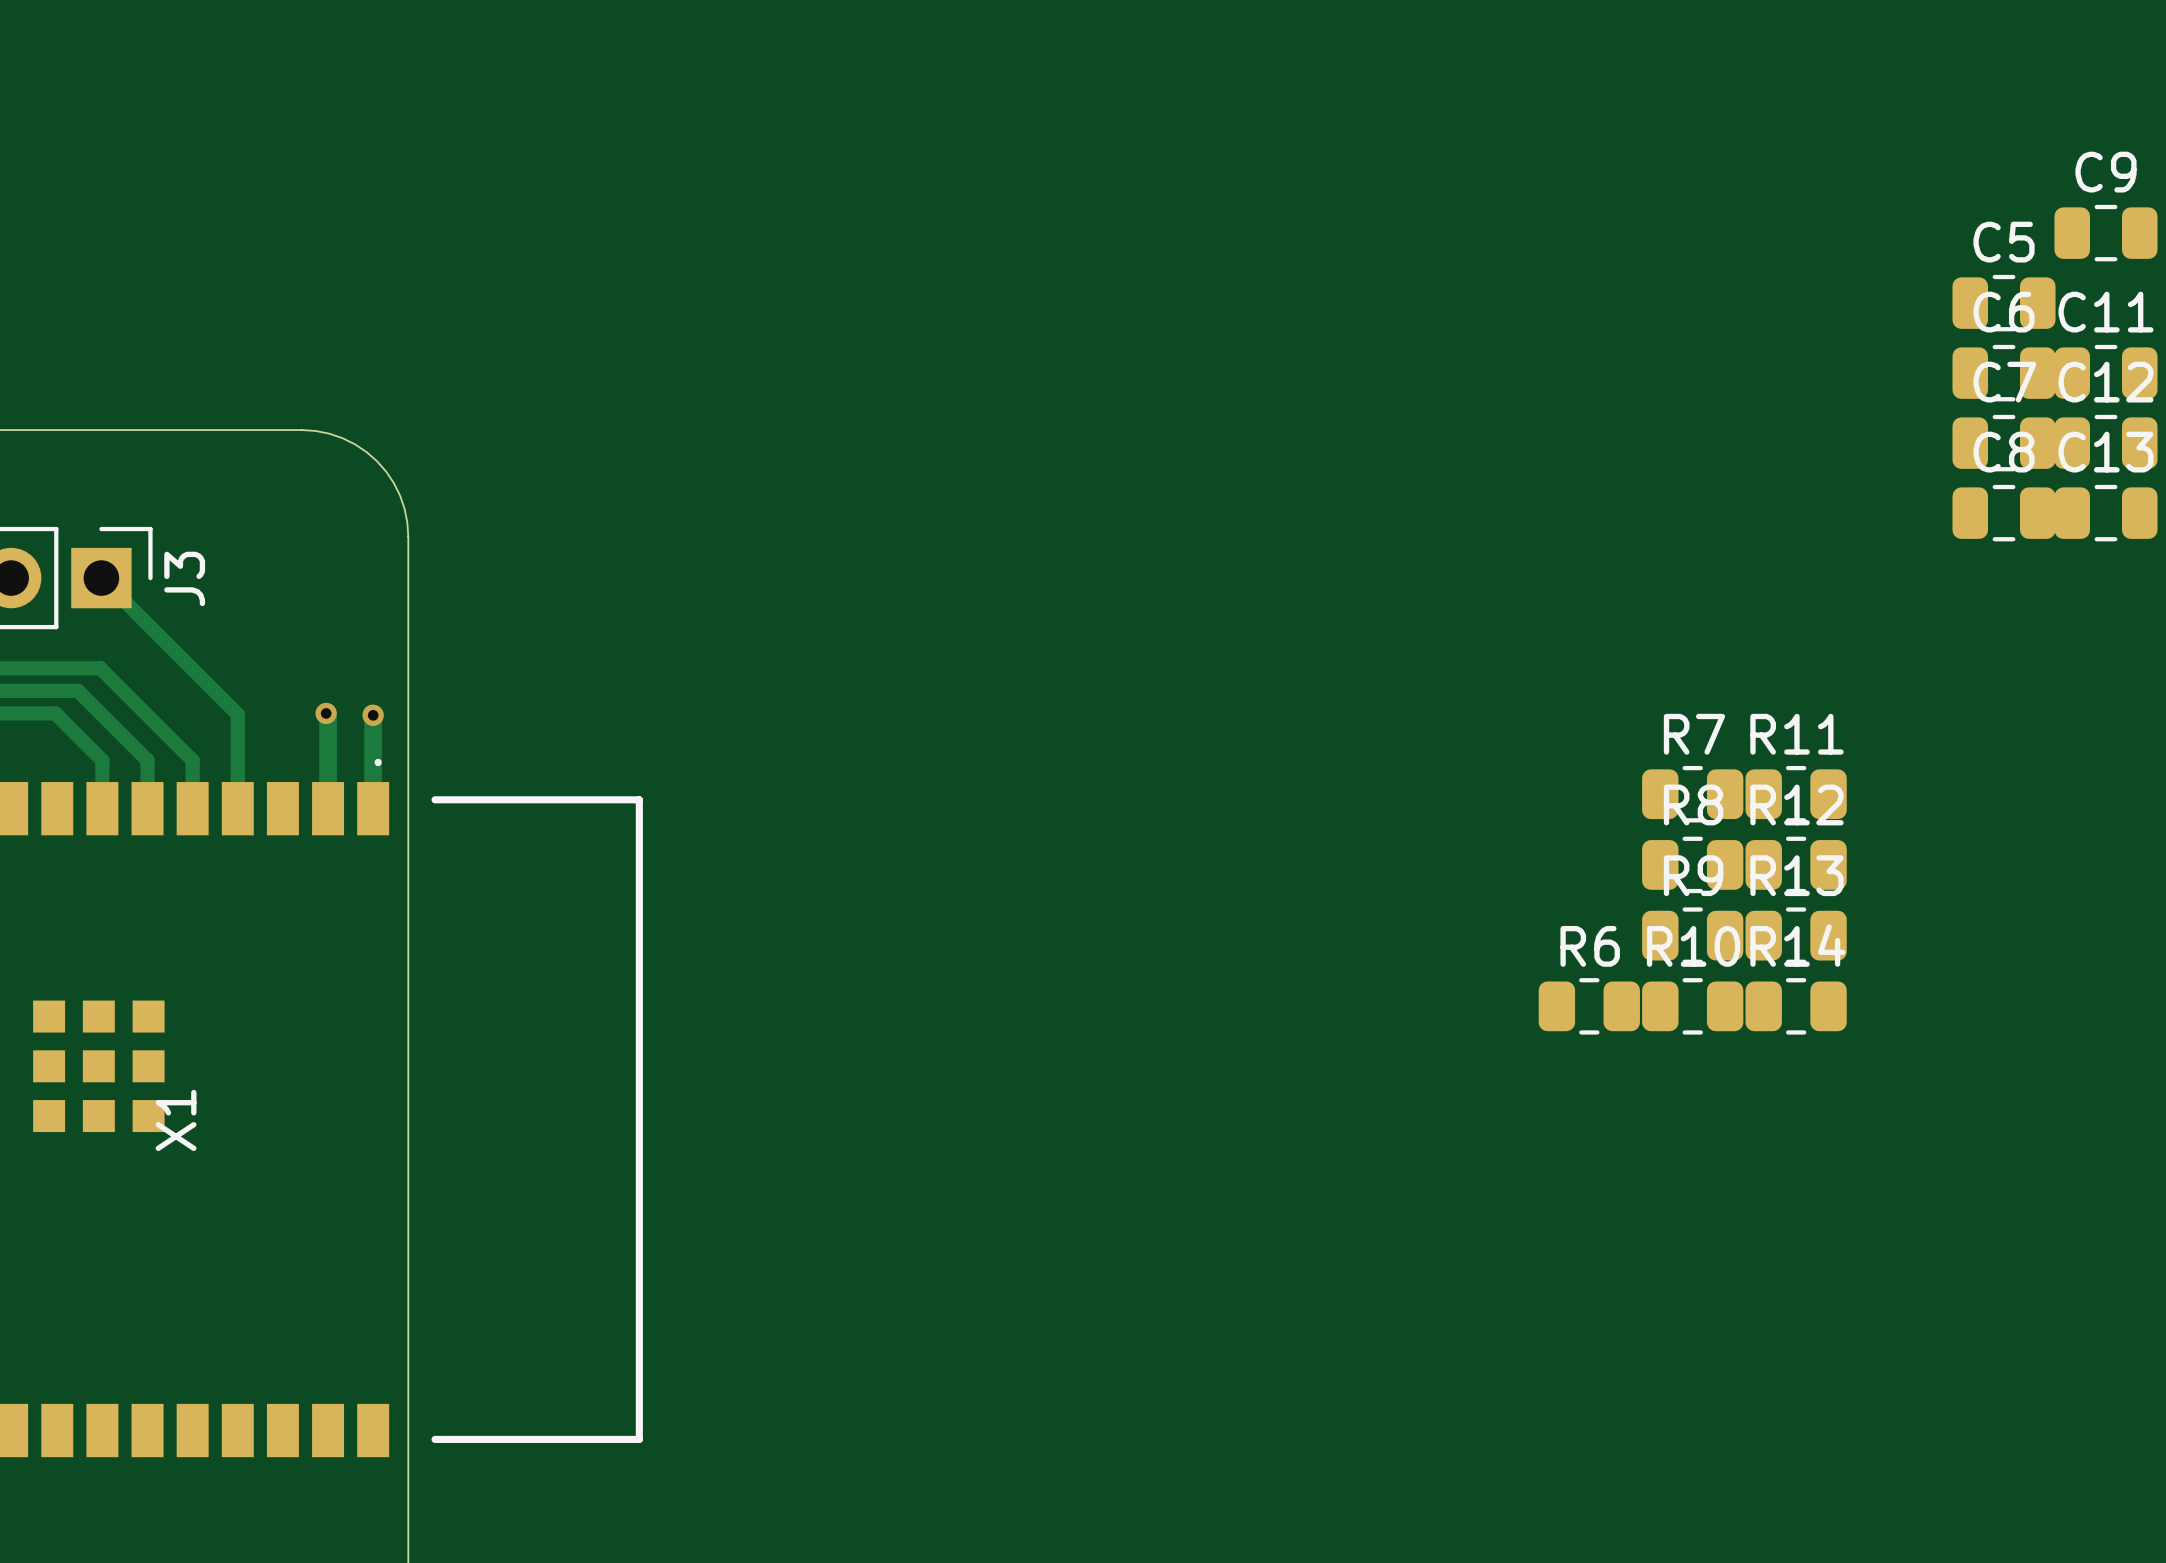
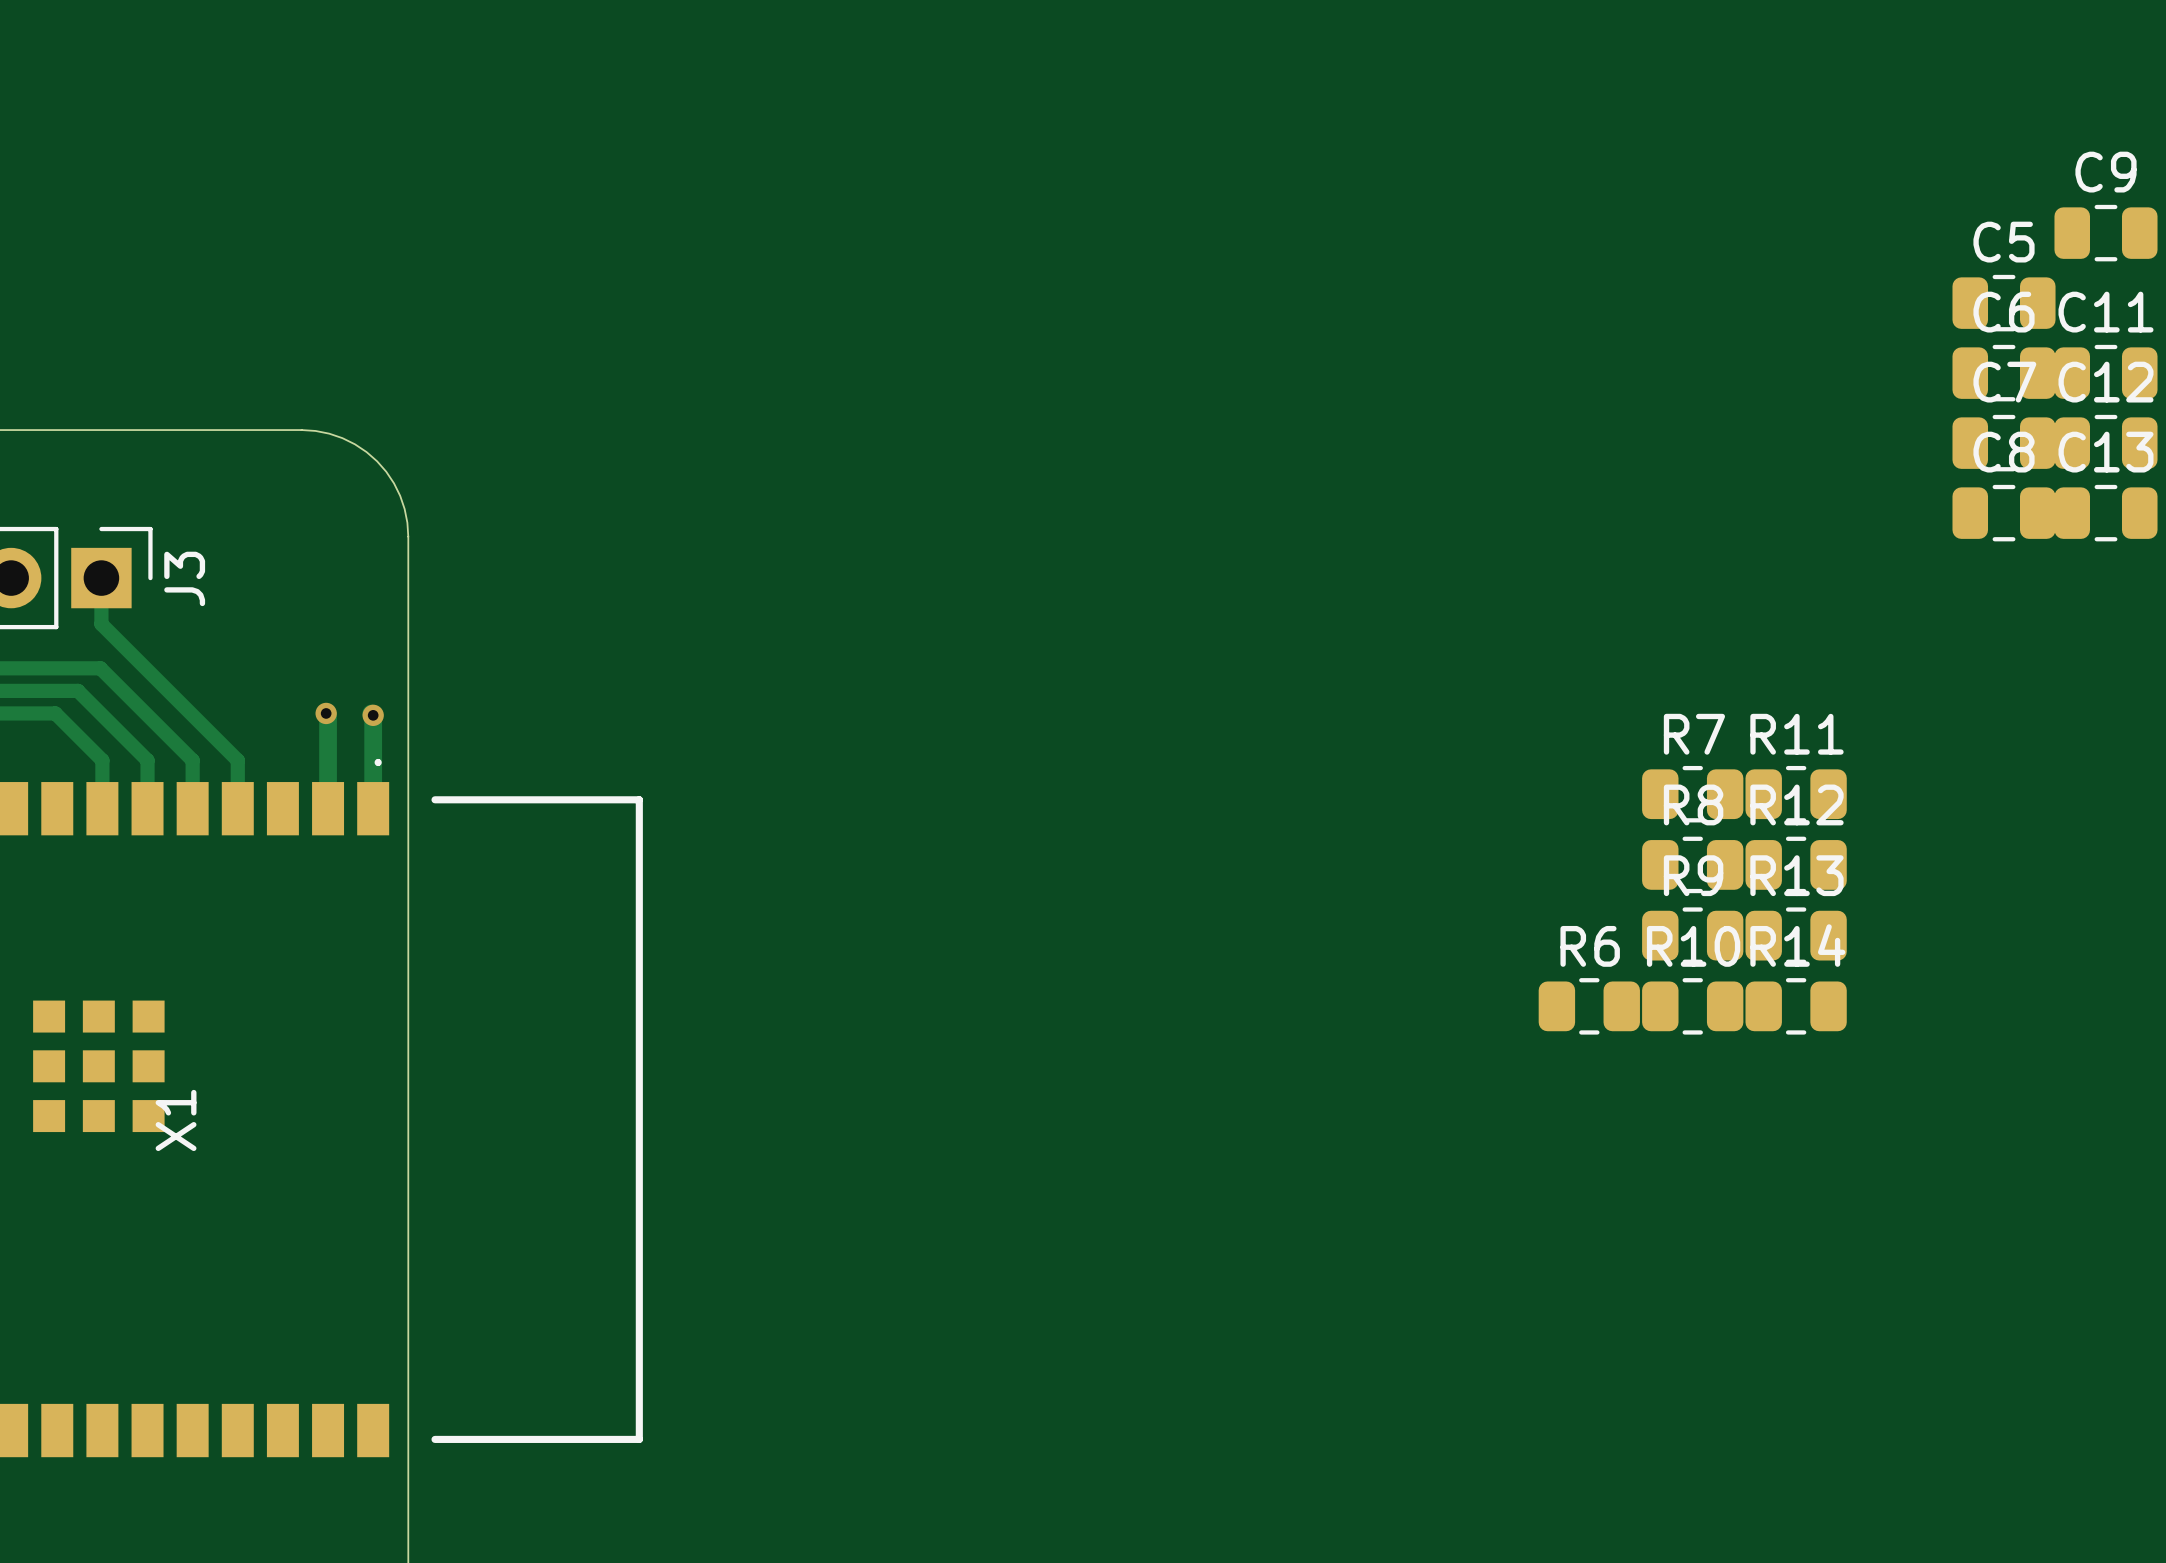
track: (101, 578) (237, 714) (237, 760) -> (101, 578) (101, 624) (237, 760)

